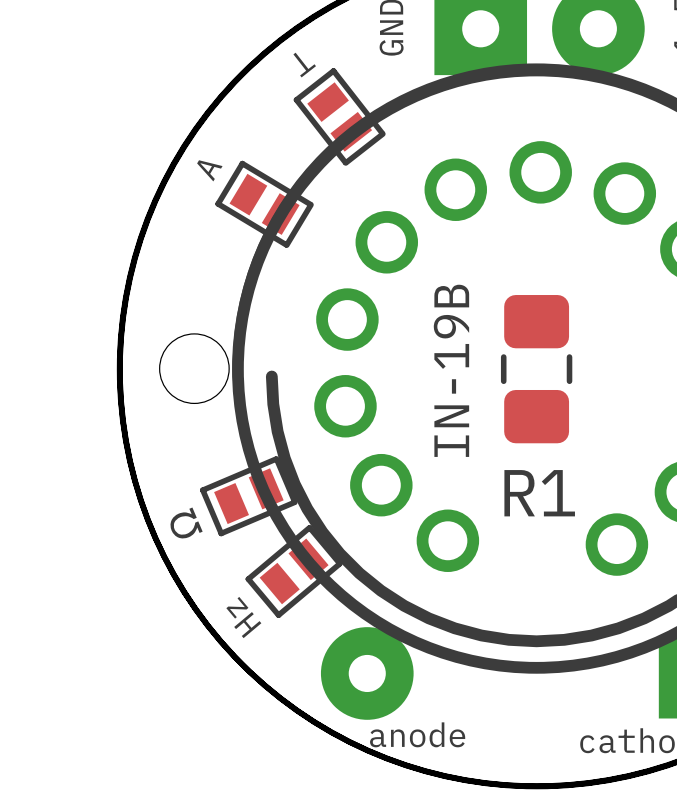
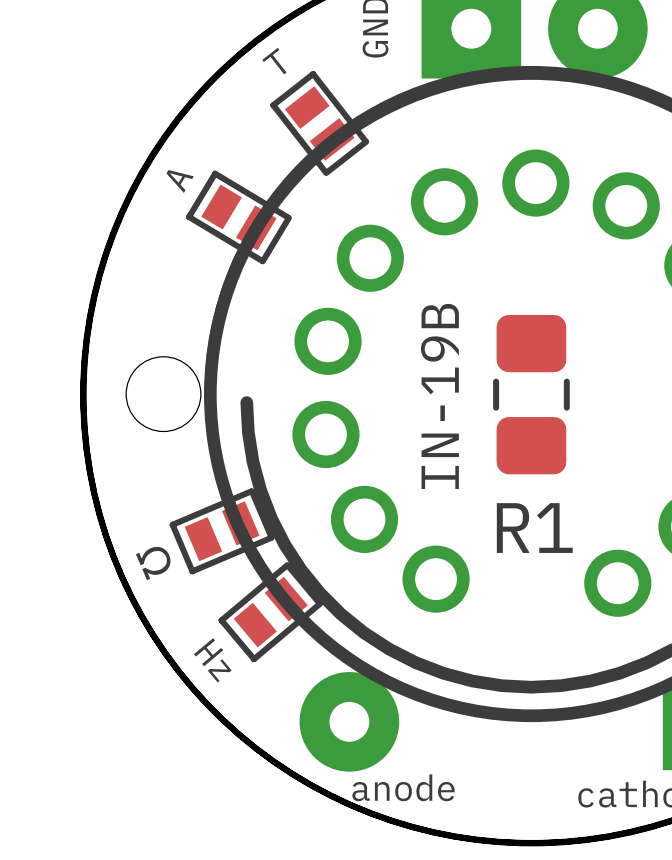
T name rotation: 0° (304, 65) -> 180° (274, 61)
Ω name rotation: 0° (186, 523) -> 180° (153, 562)
Hz name rotation: 0° (243, 617) -> 180° (212, 660)

